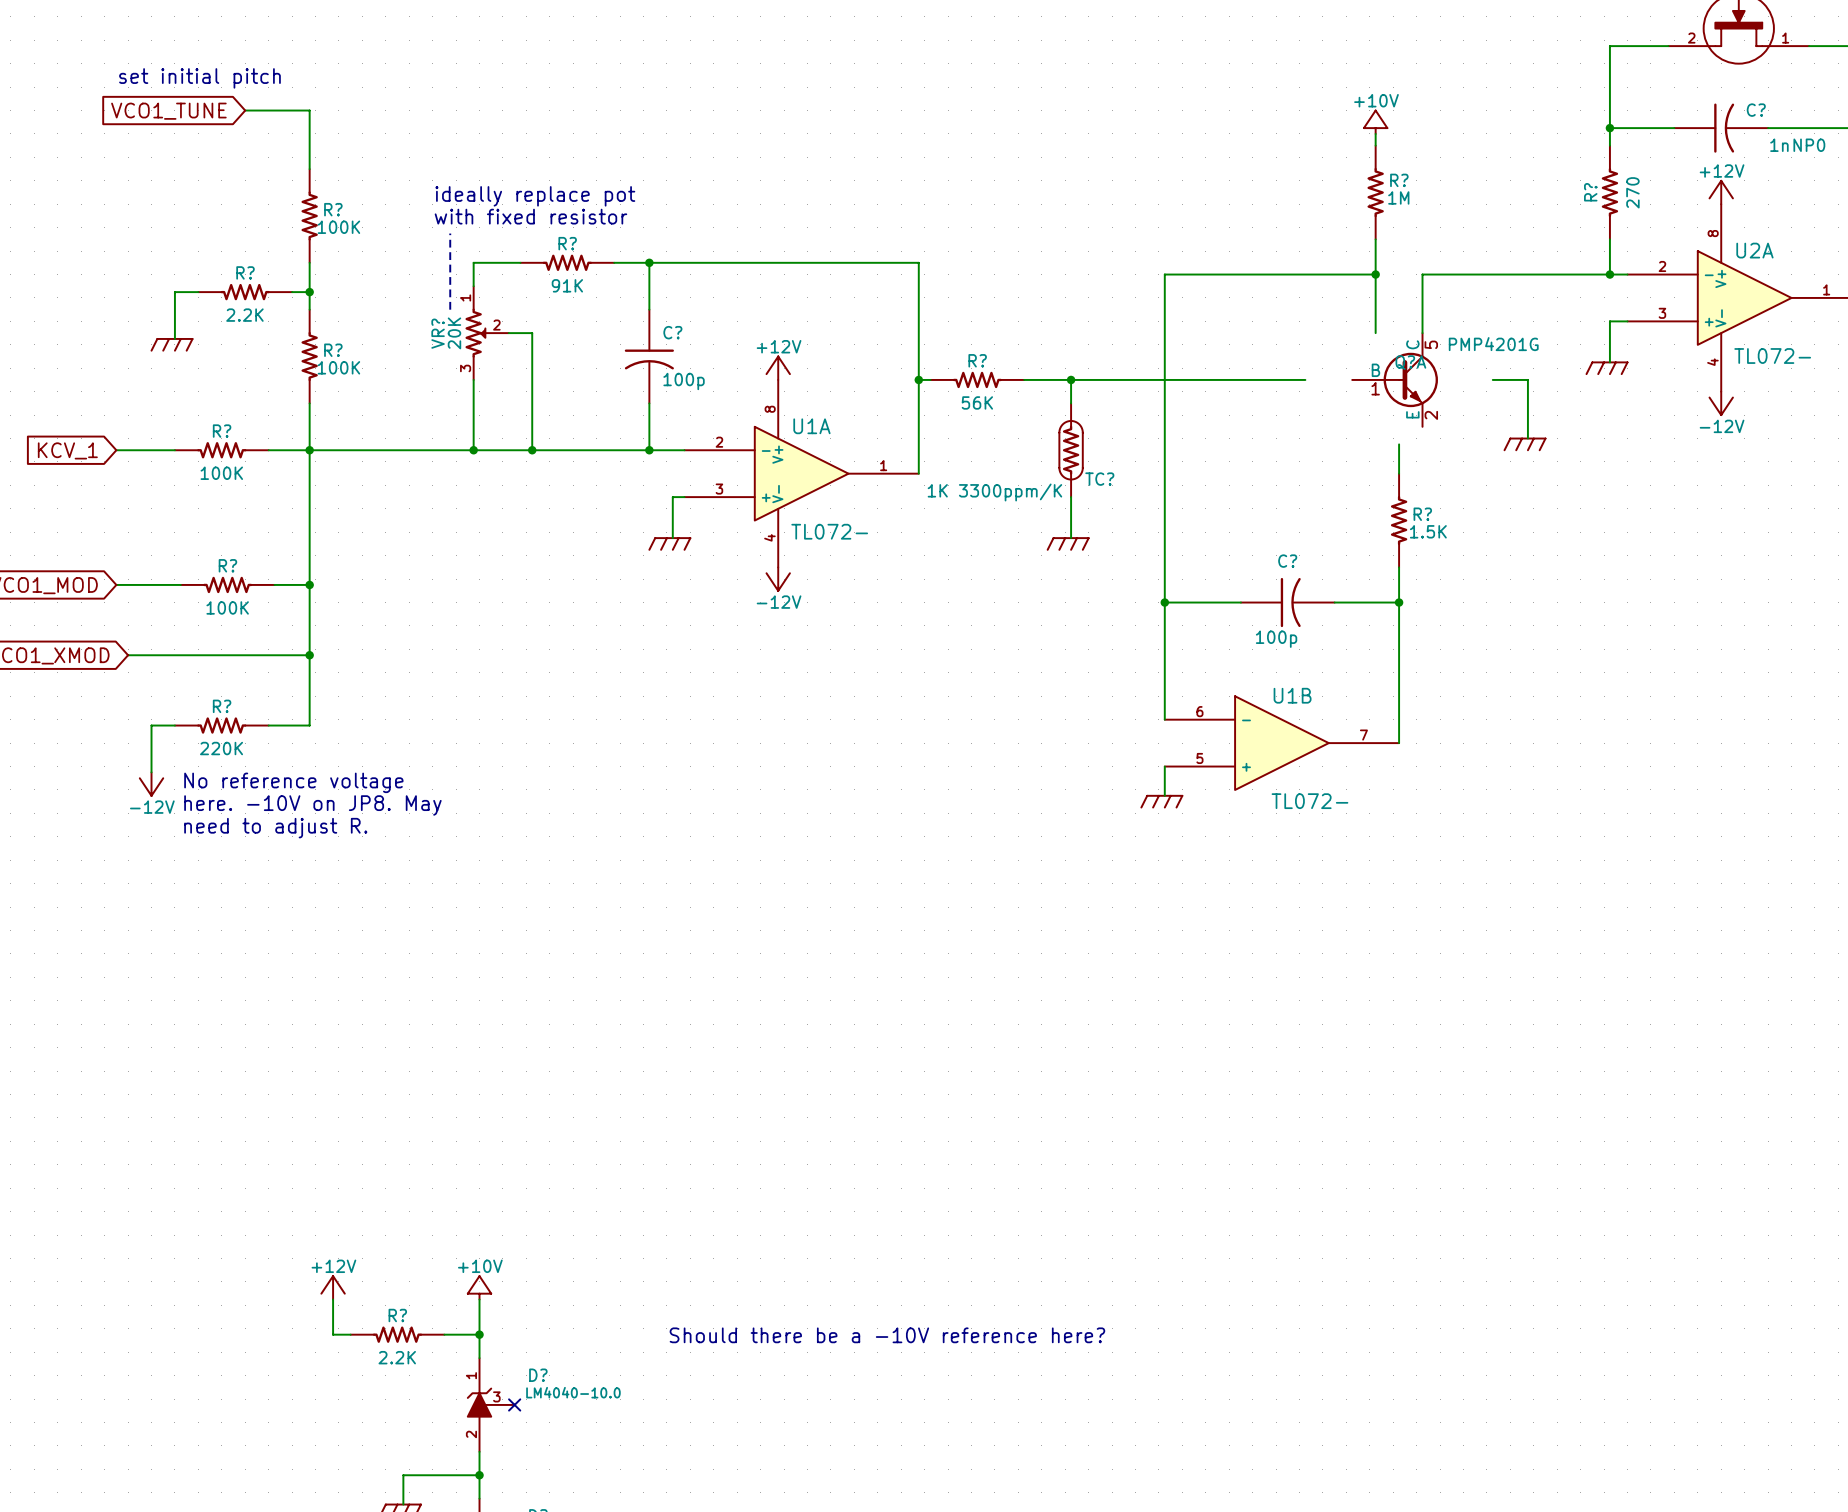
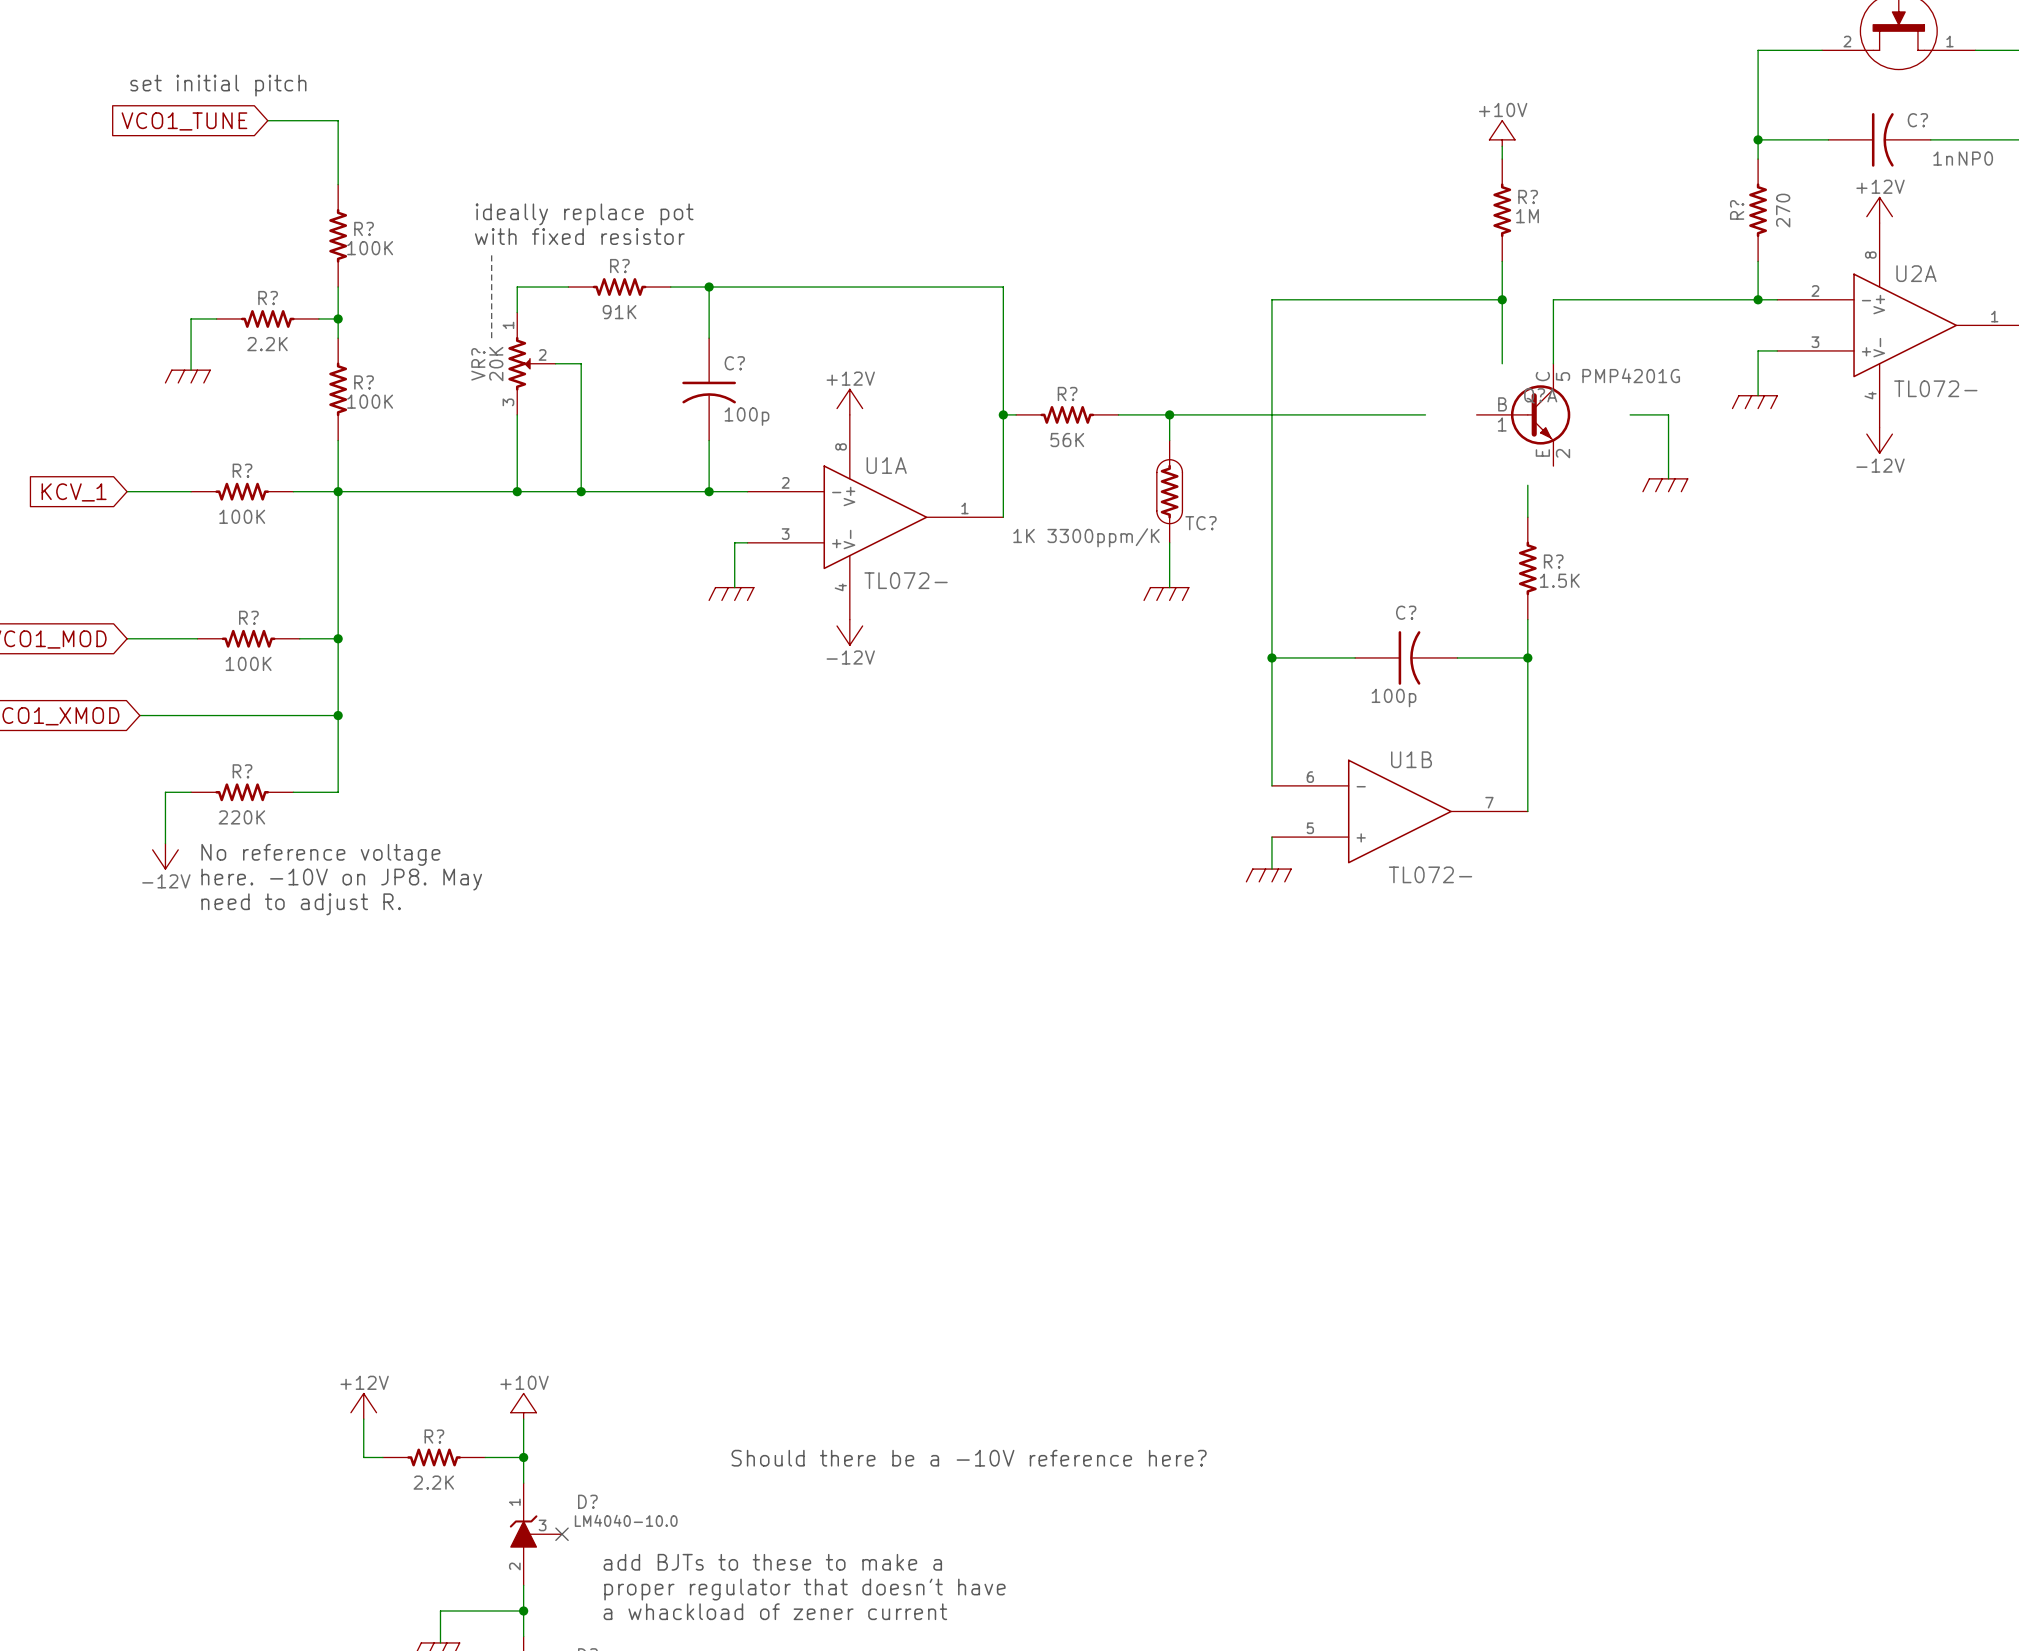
text: none -> add BJTs to these to make a (772, 1562)
text: none -> proper regulator that doesn't have (804, 1589)
text: none -> a whackload of zener current (775, 1611)

